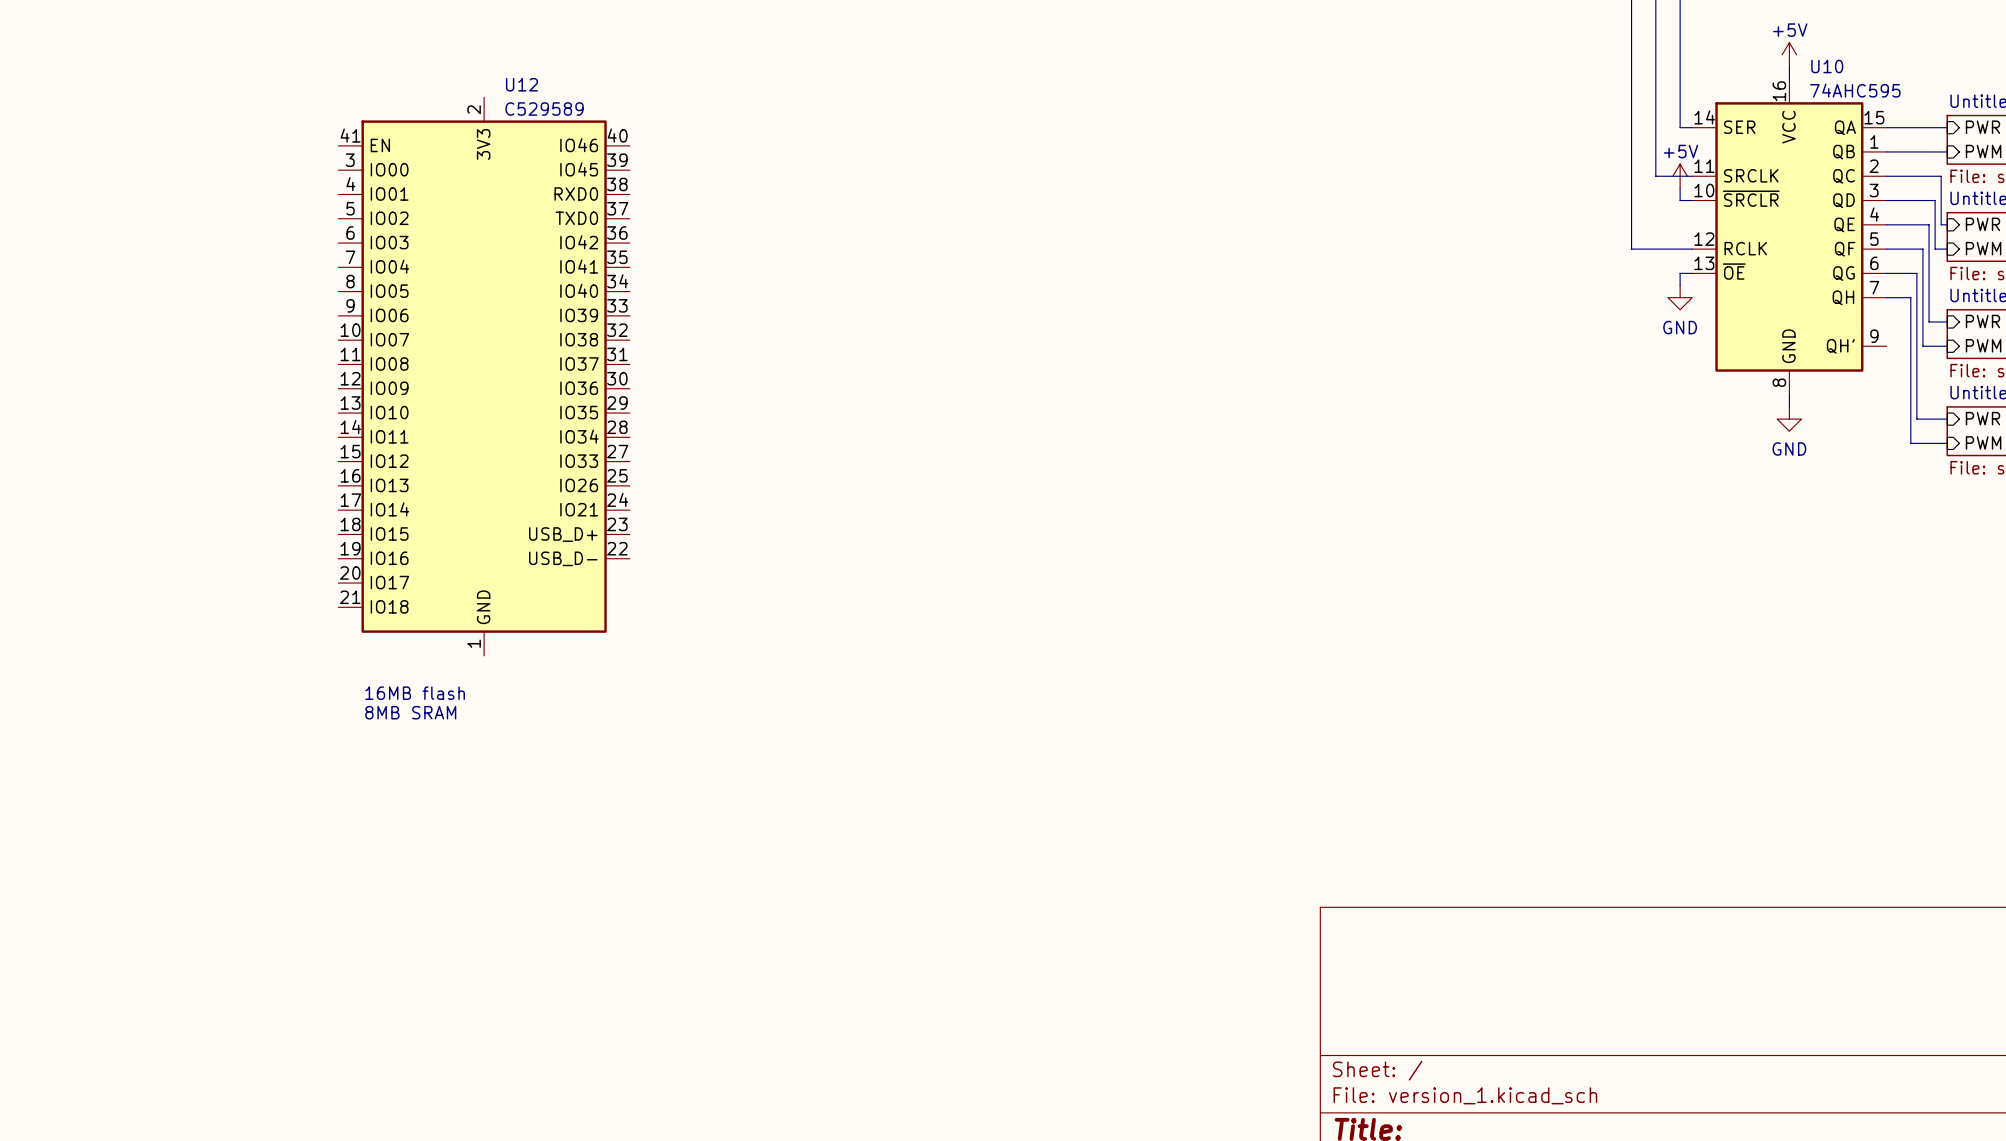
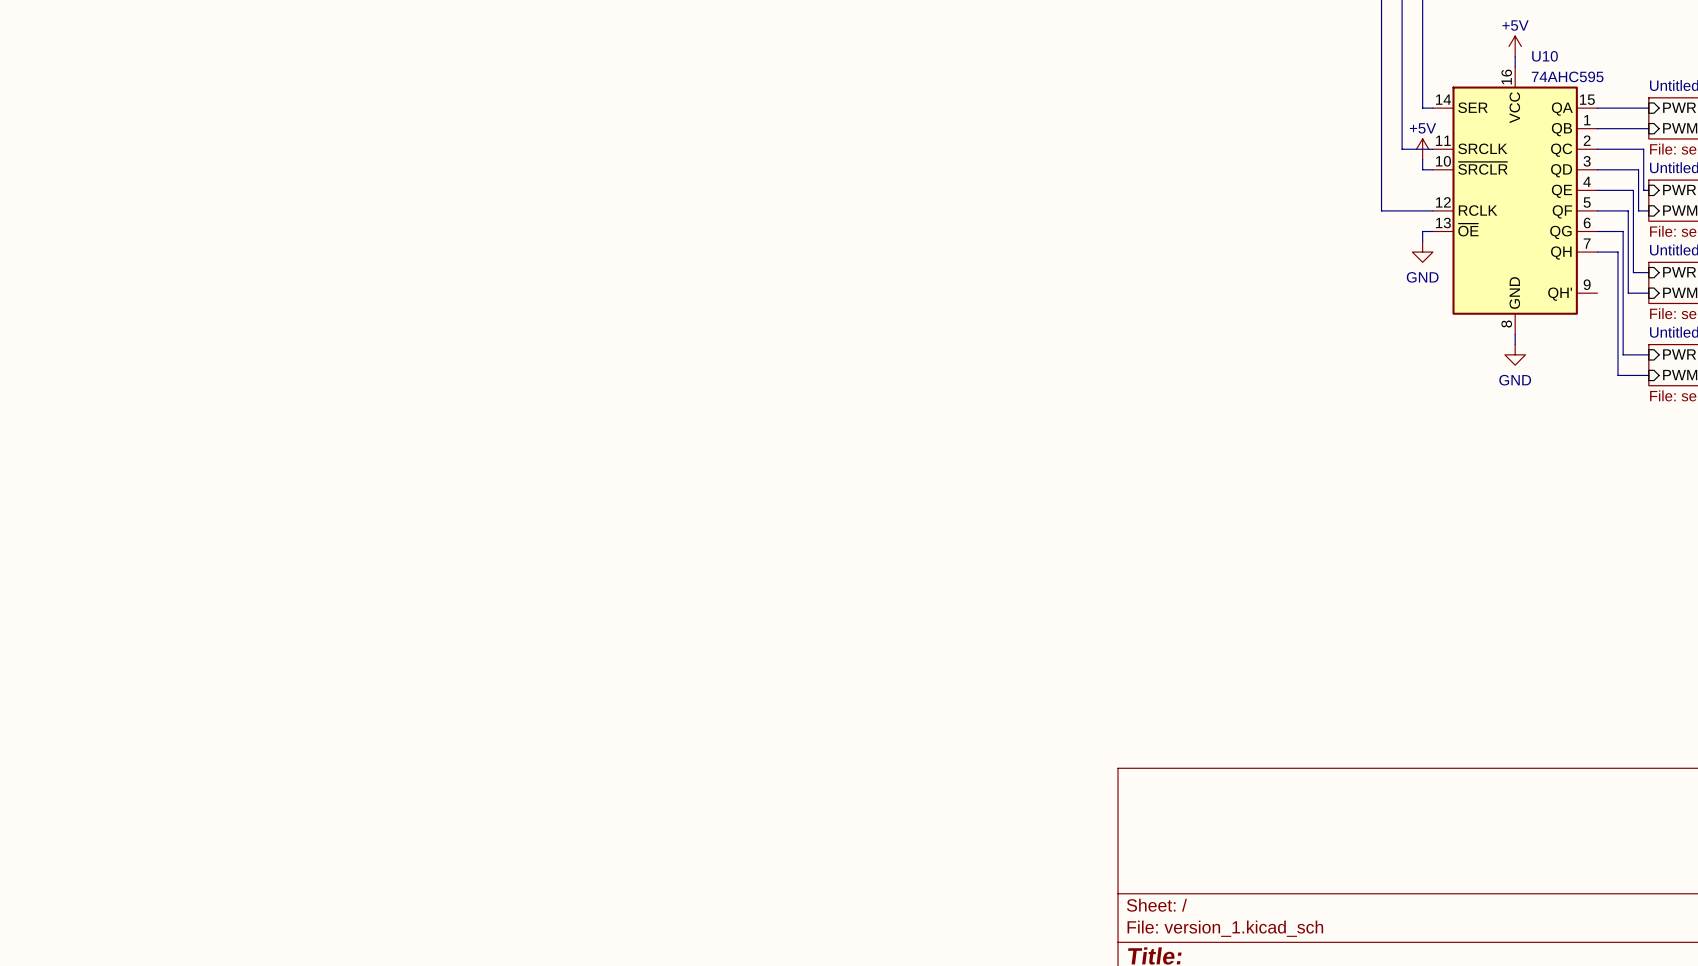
U12: C529589 (484, 376) -> none
text: 16MB flash (415, 693) -> none
text: 8MB SRAM (410, 712) -> none

